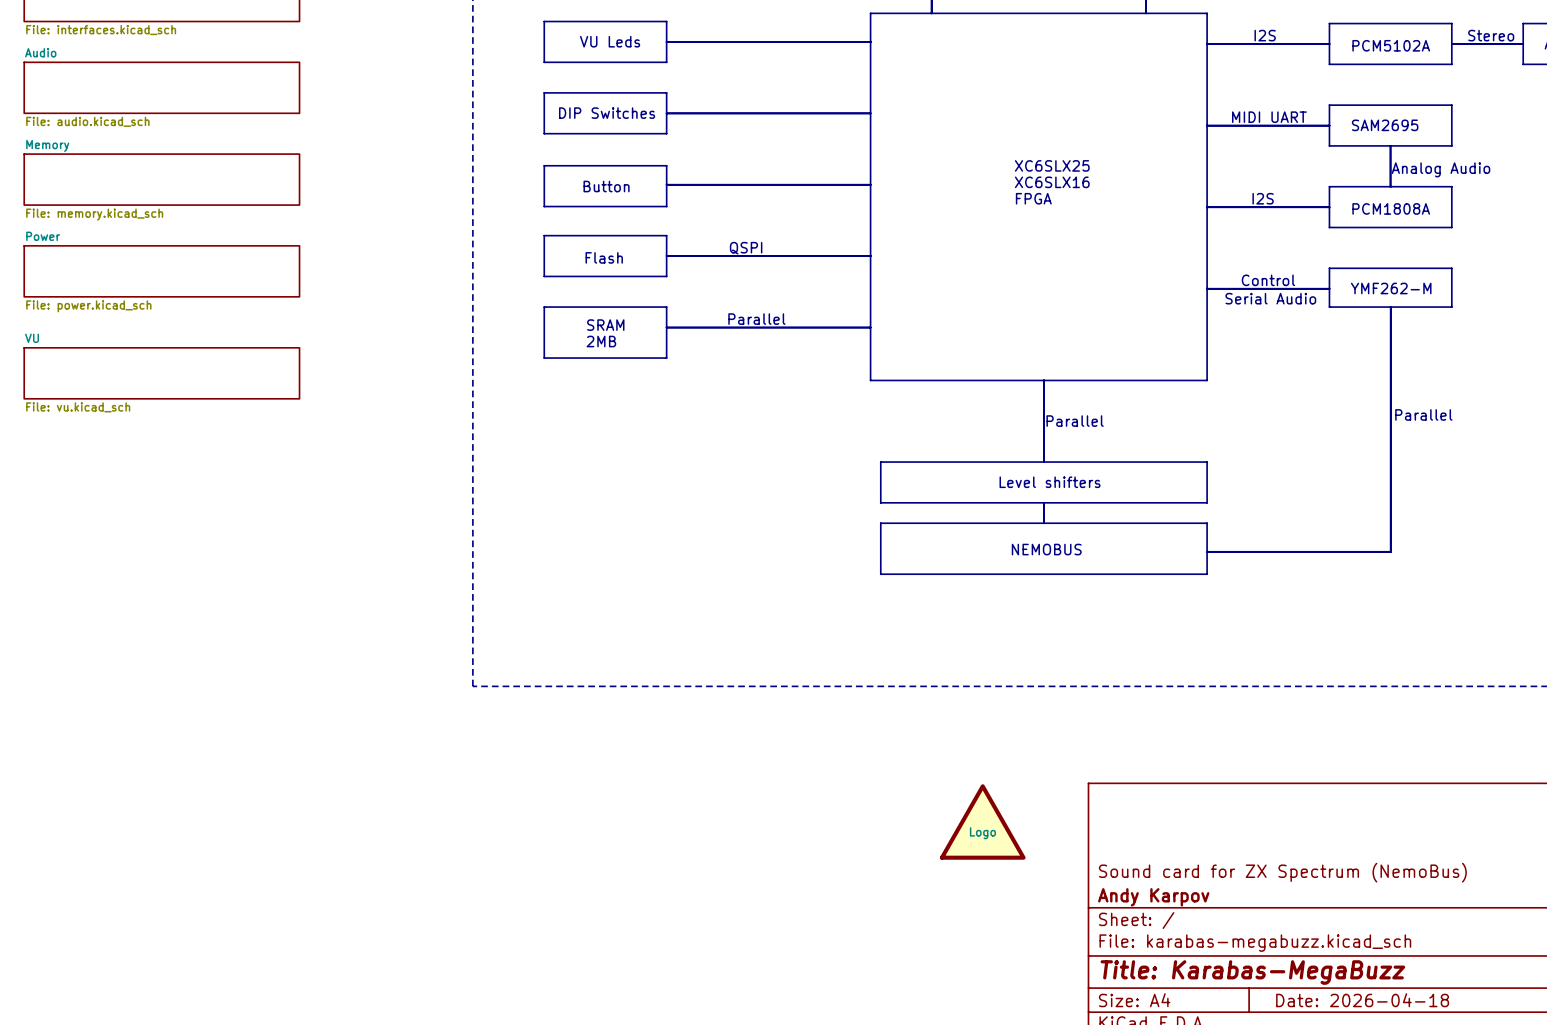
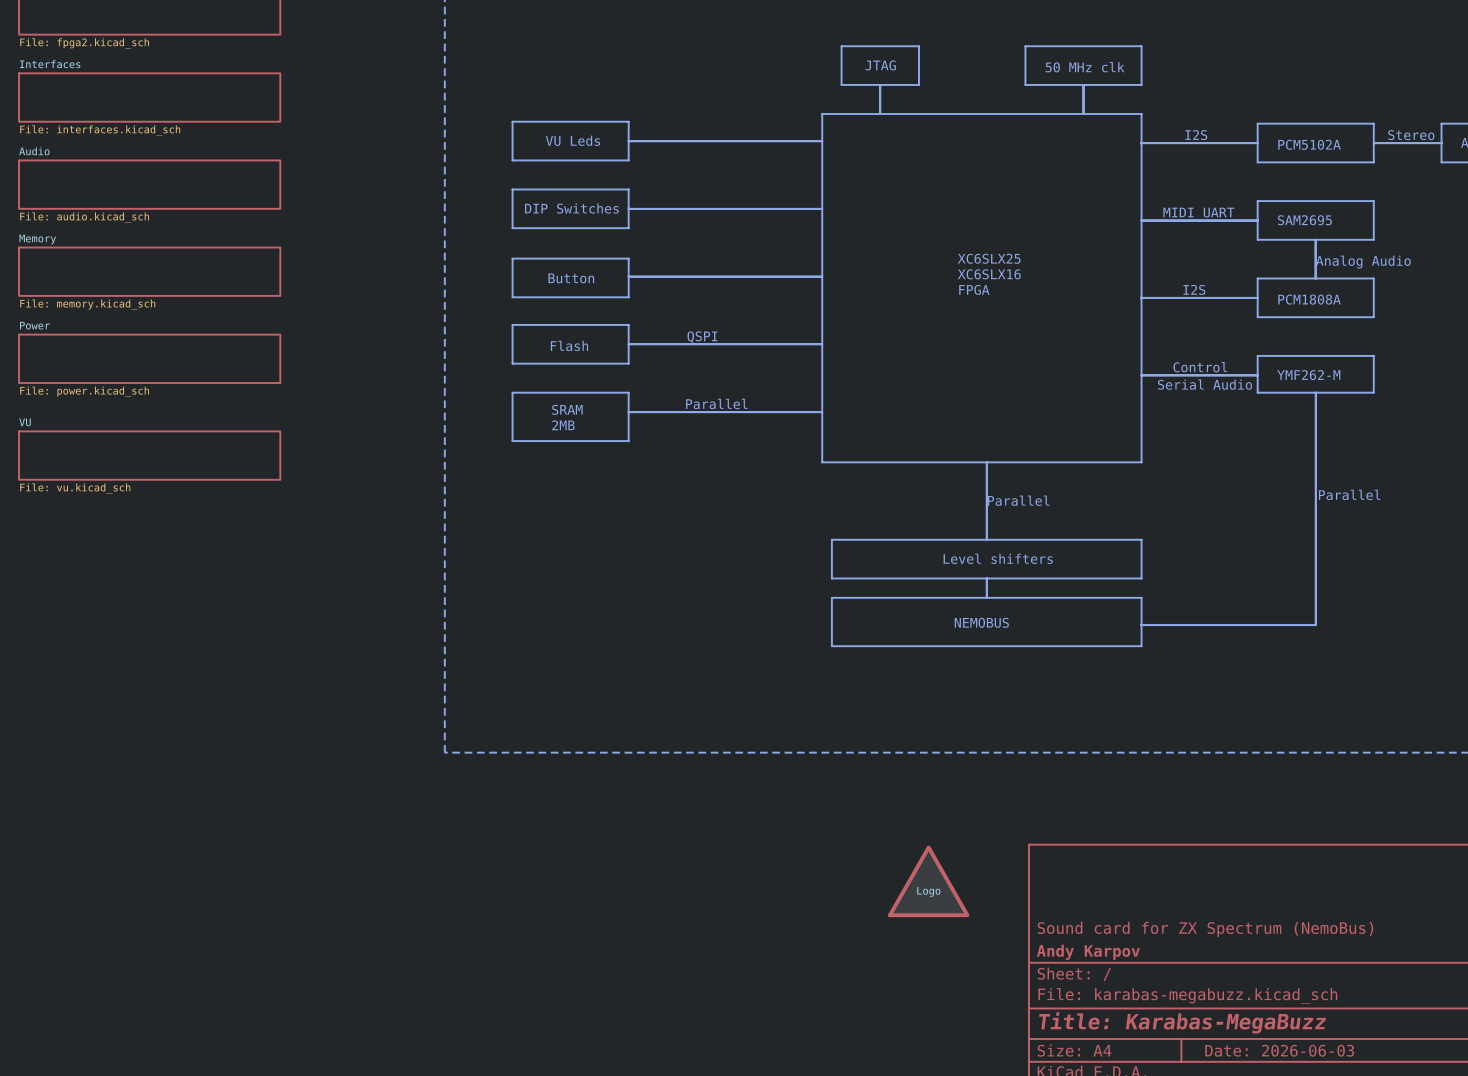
title block: Date: 2026-04-18 (1362, 1000) -> Date: 2026-06-03 (1279, 1050)

